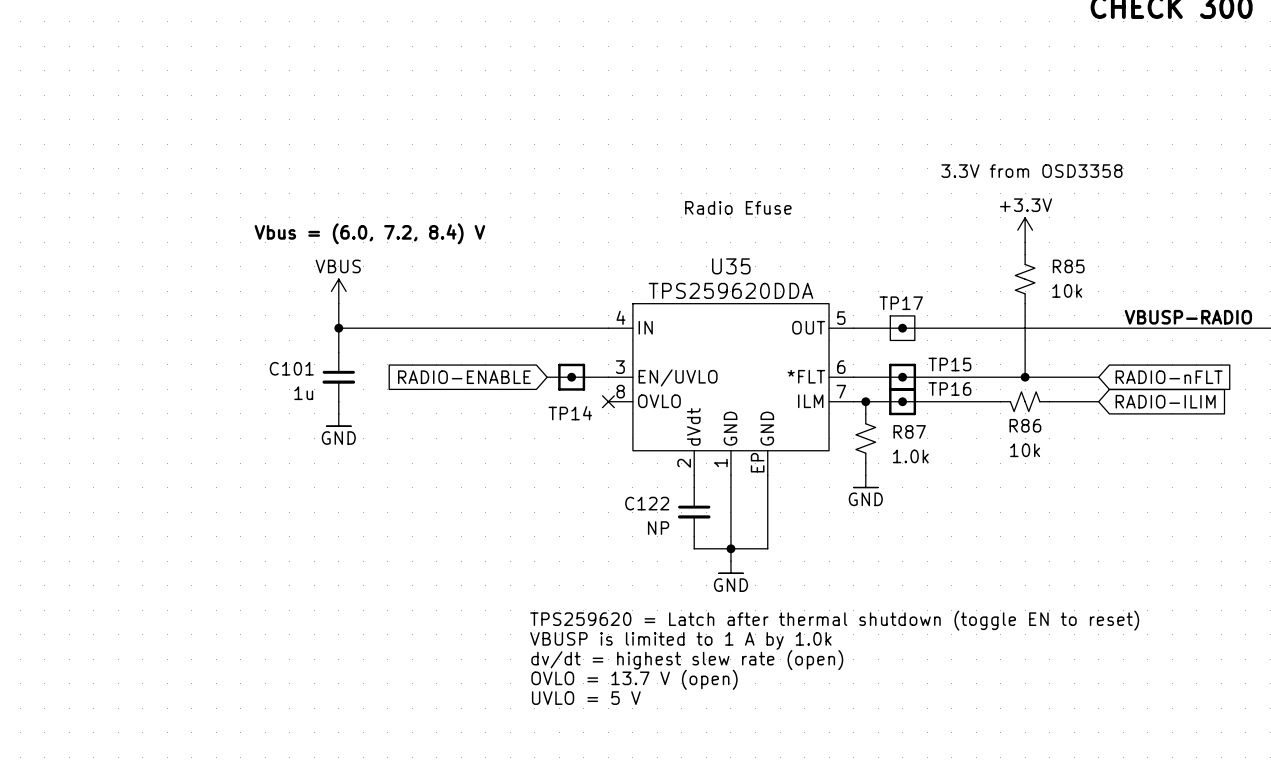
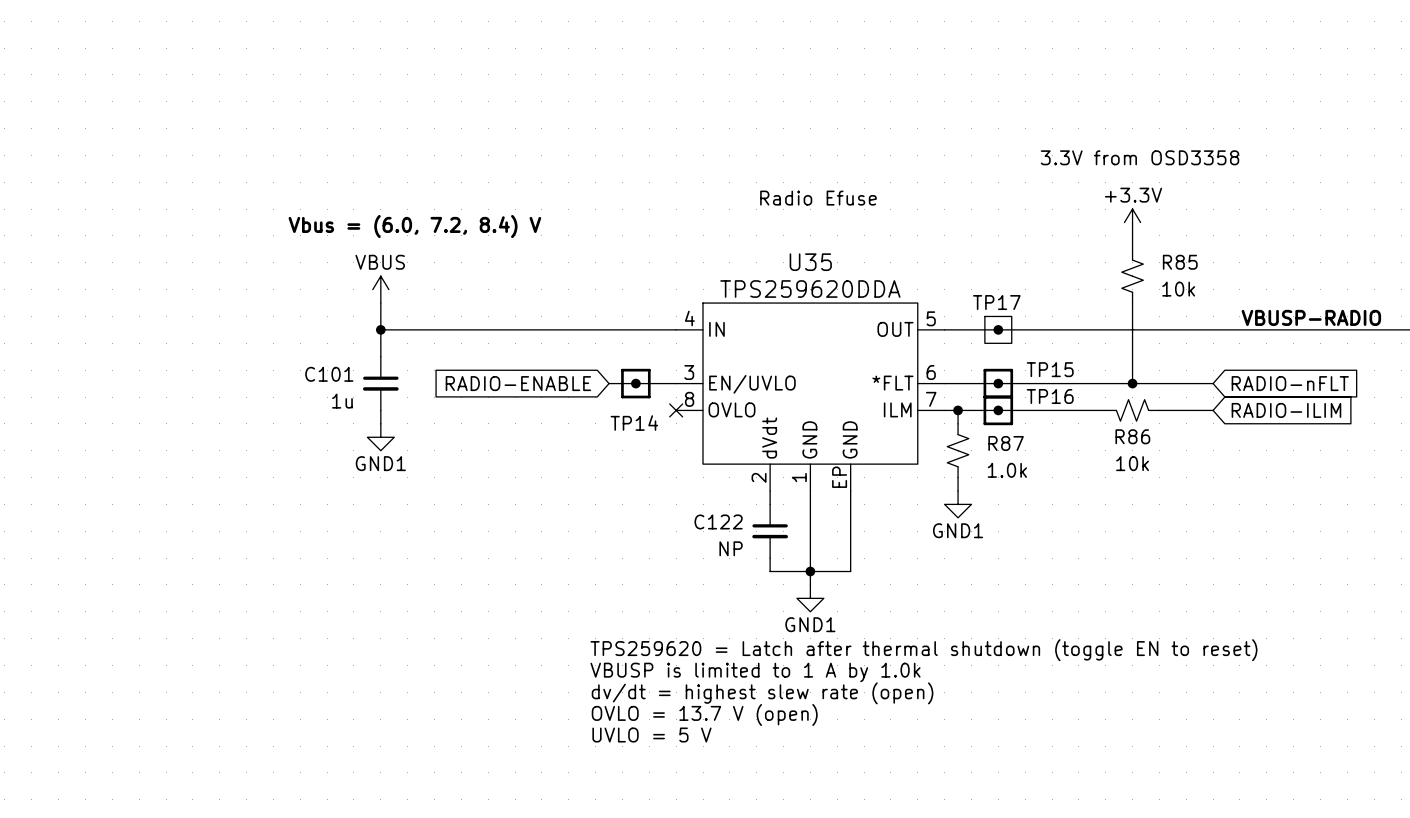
power symbol: GND (338, 420) -> GND1 (380, 437)
power symbol: GND (865, 481) -> GND1 (958, 504)
power symbol: GND (730, 567) -> GND1 (810, 598)

